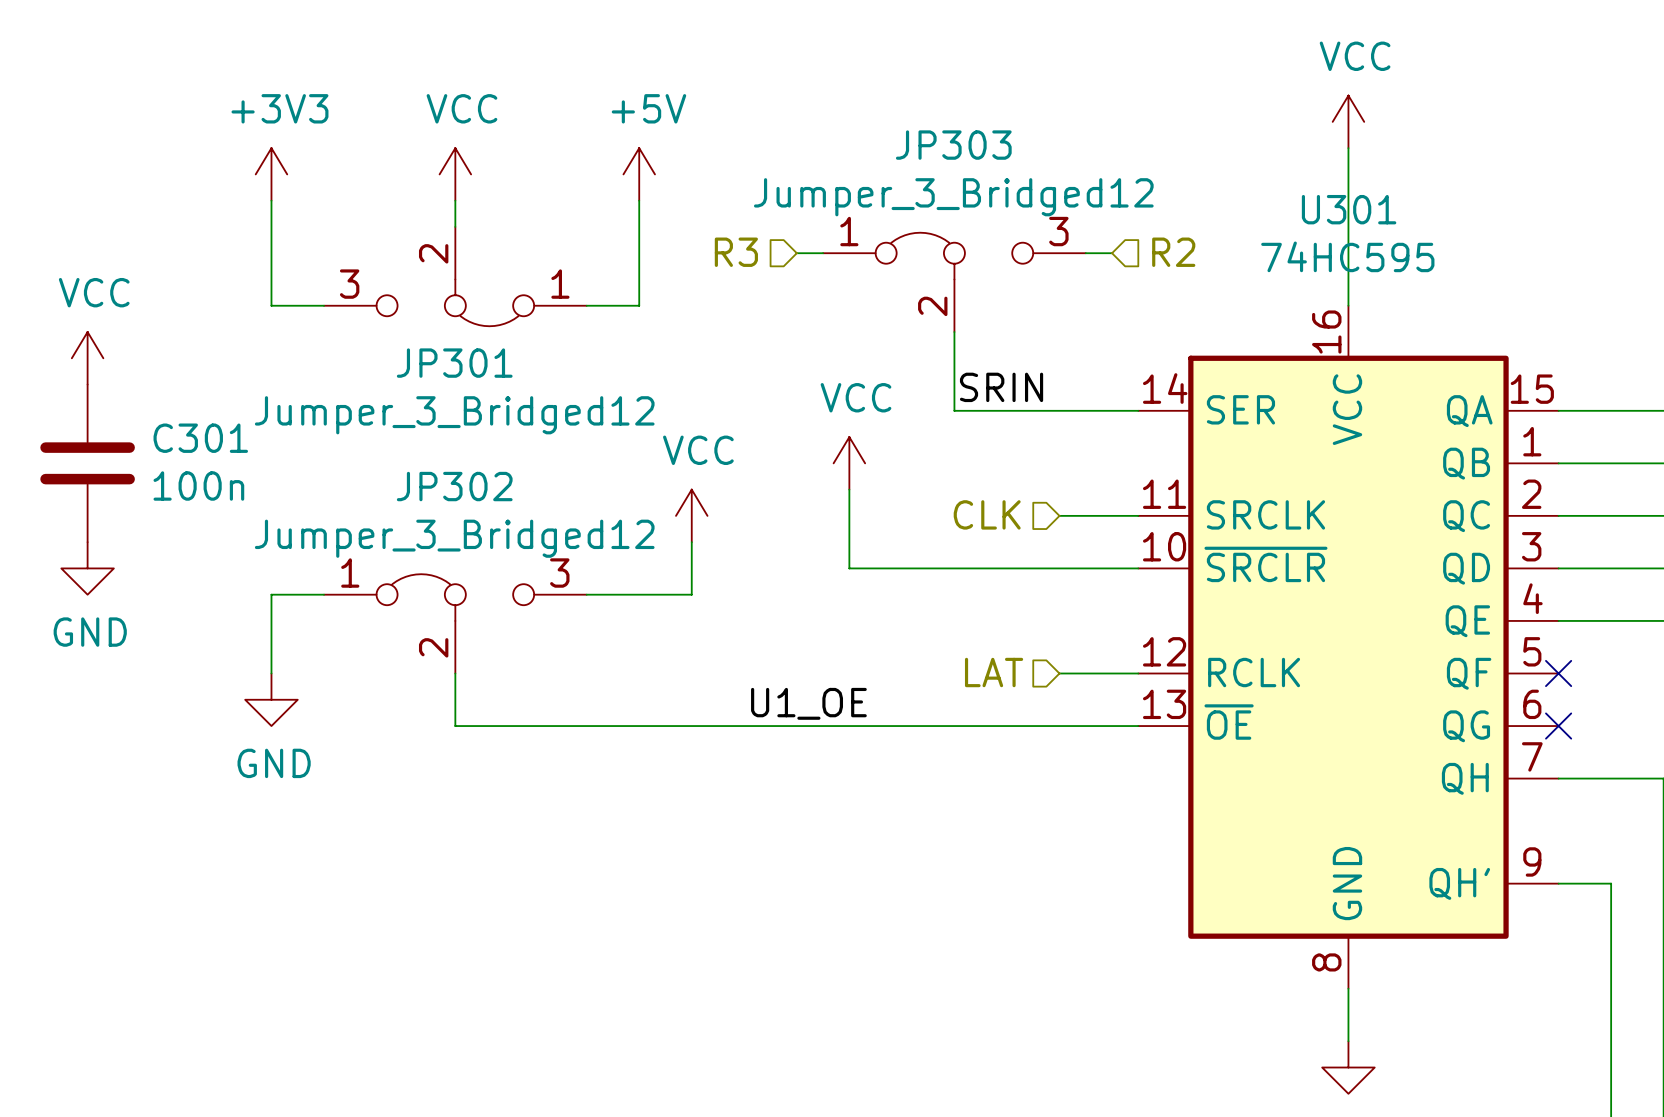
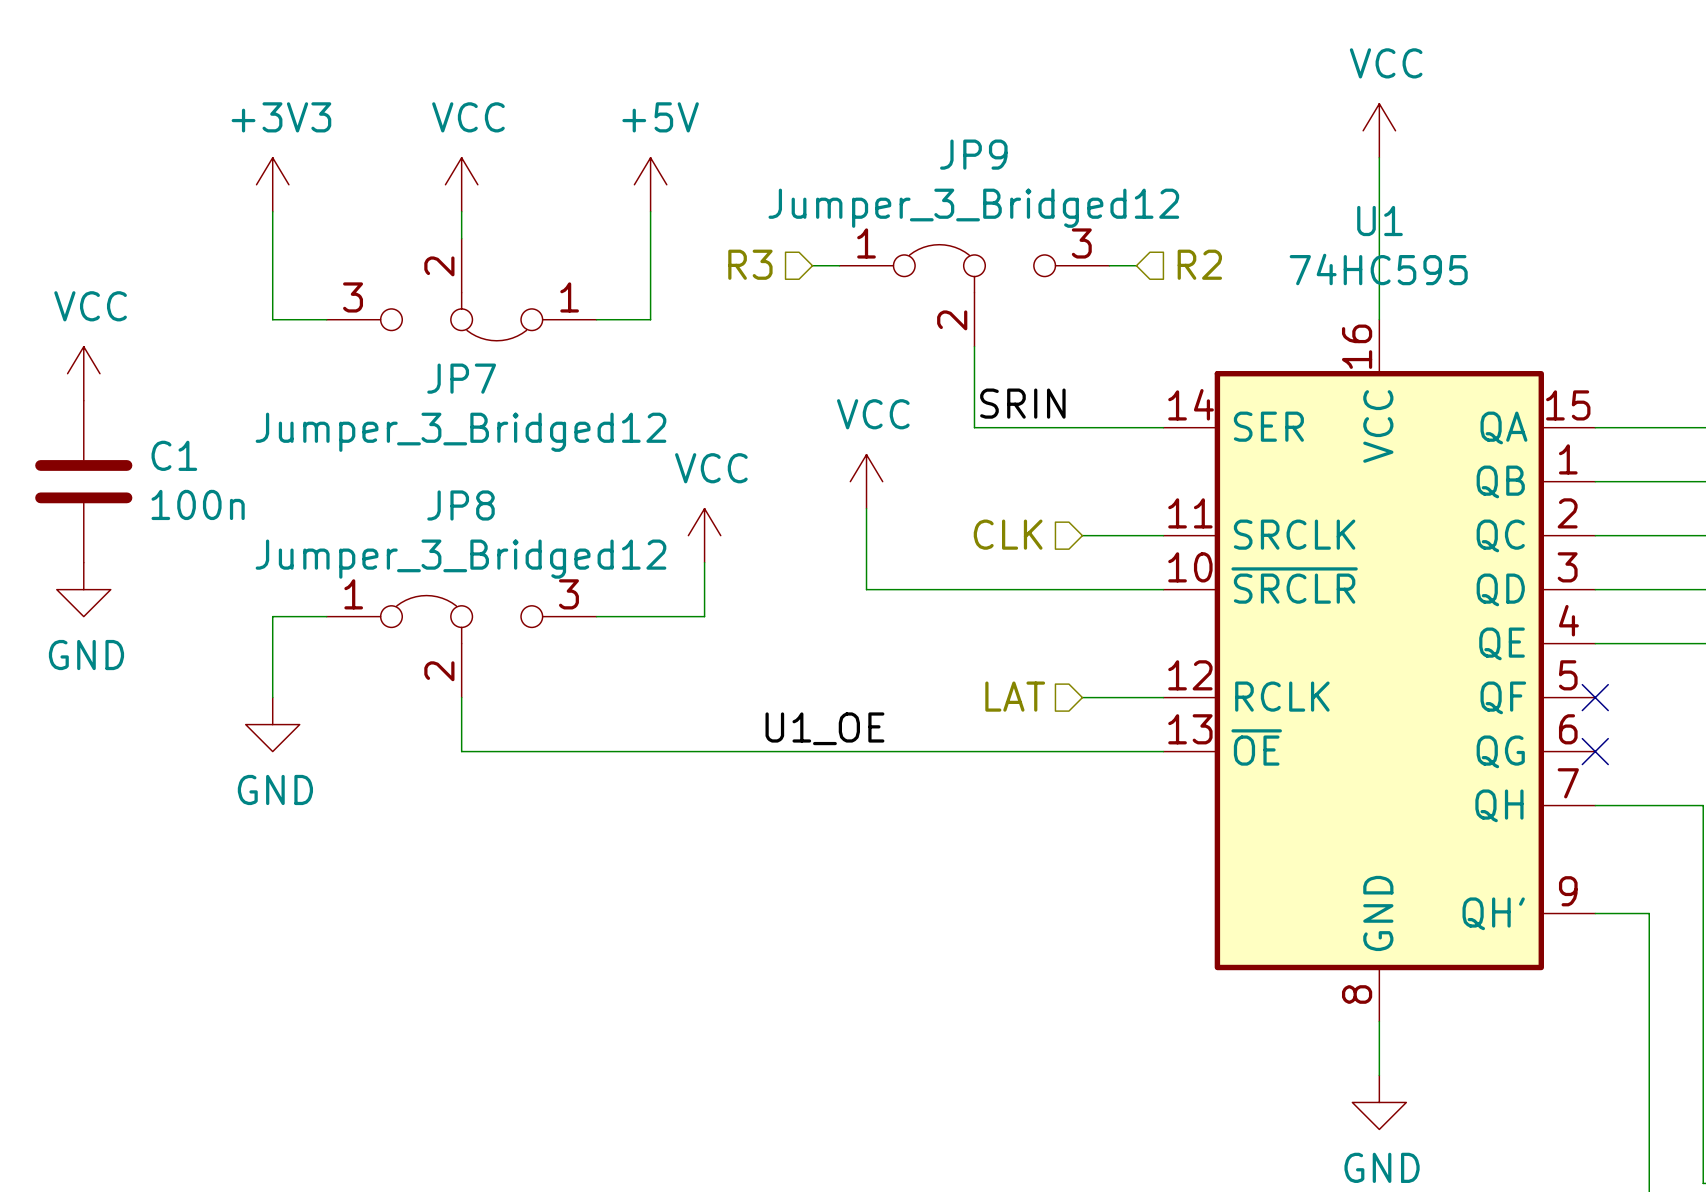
JP303 name: JP303 (953, 145) -> JP9 (973, 154)
U301 name: U301 (1349, 209) -> U1 (1379, 221)
JP301 name: JP301 (454, 363) -> JP7 (461, 378)
C301 name: C301 (200, 438) -> C1 (174, 455)
JP302 name: JP302 (454, 486) -> JP8 (461, 505)

